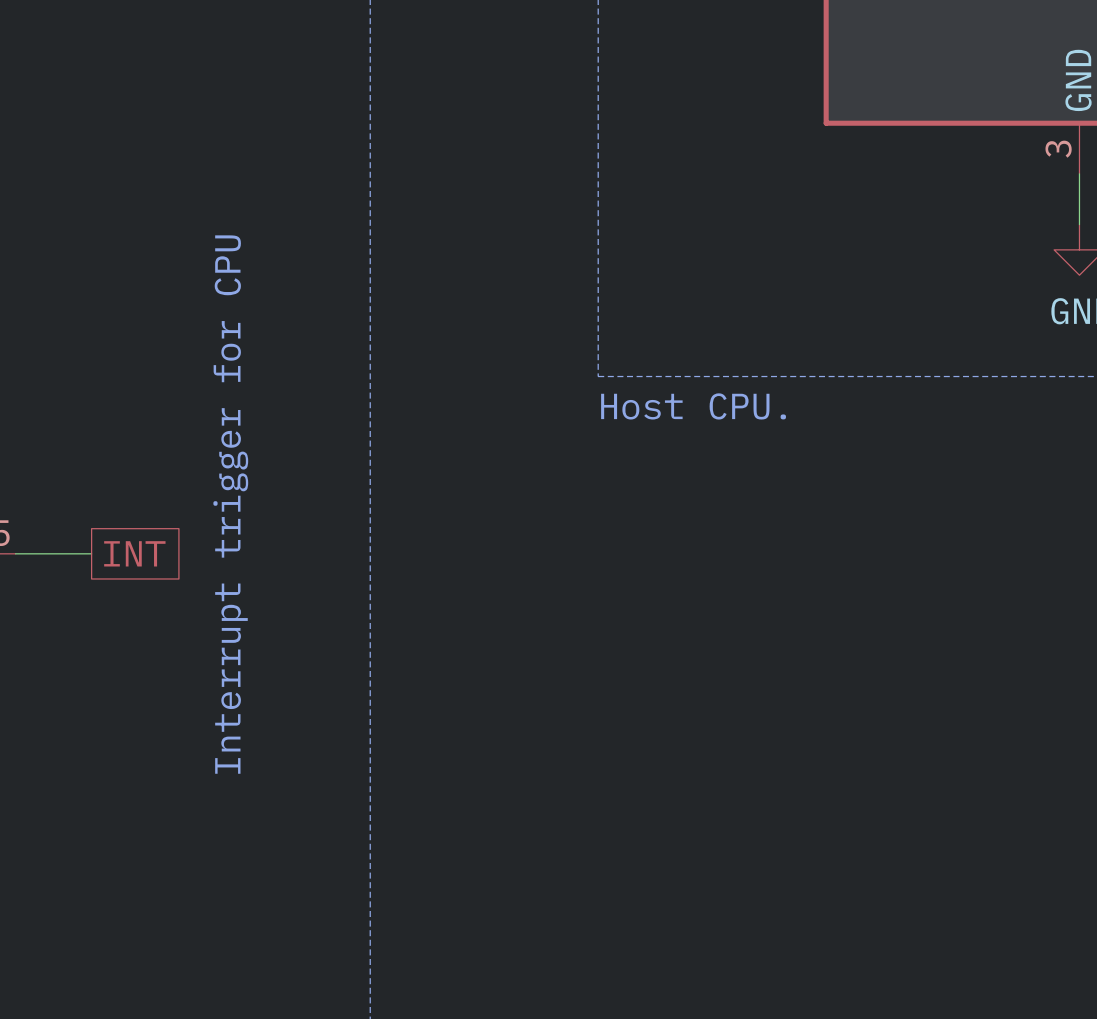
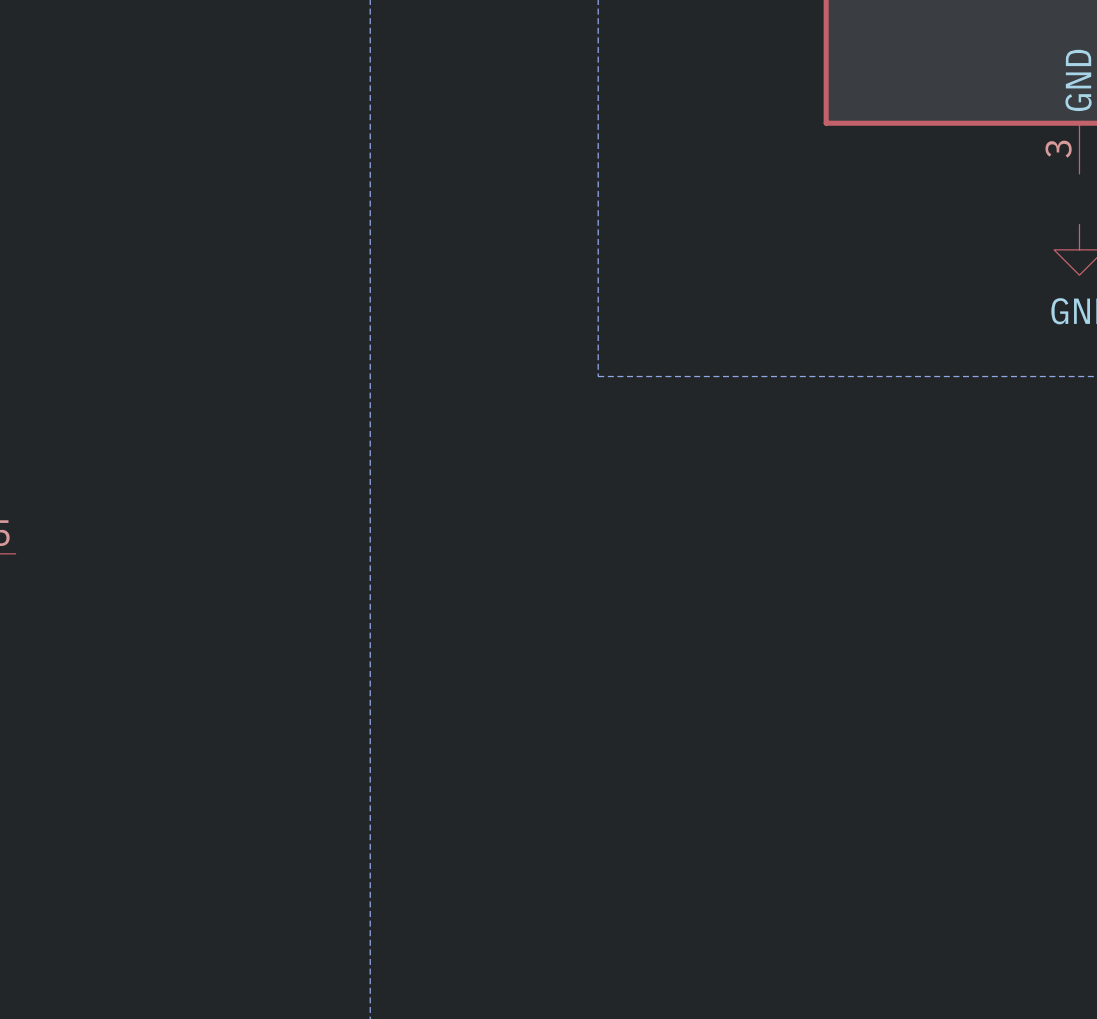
wire: (1079, 173) (1079, 224) -> none
text: Host CPU. (693, 406) -> none
text: Interrupt trigger for CPU (230, 504) -> none
wire: (15, 553) (91, 553) -> none
global label: INT (134, 553) -> none

